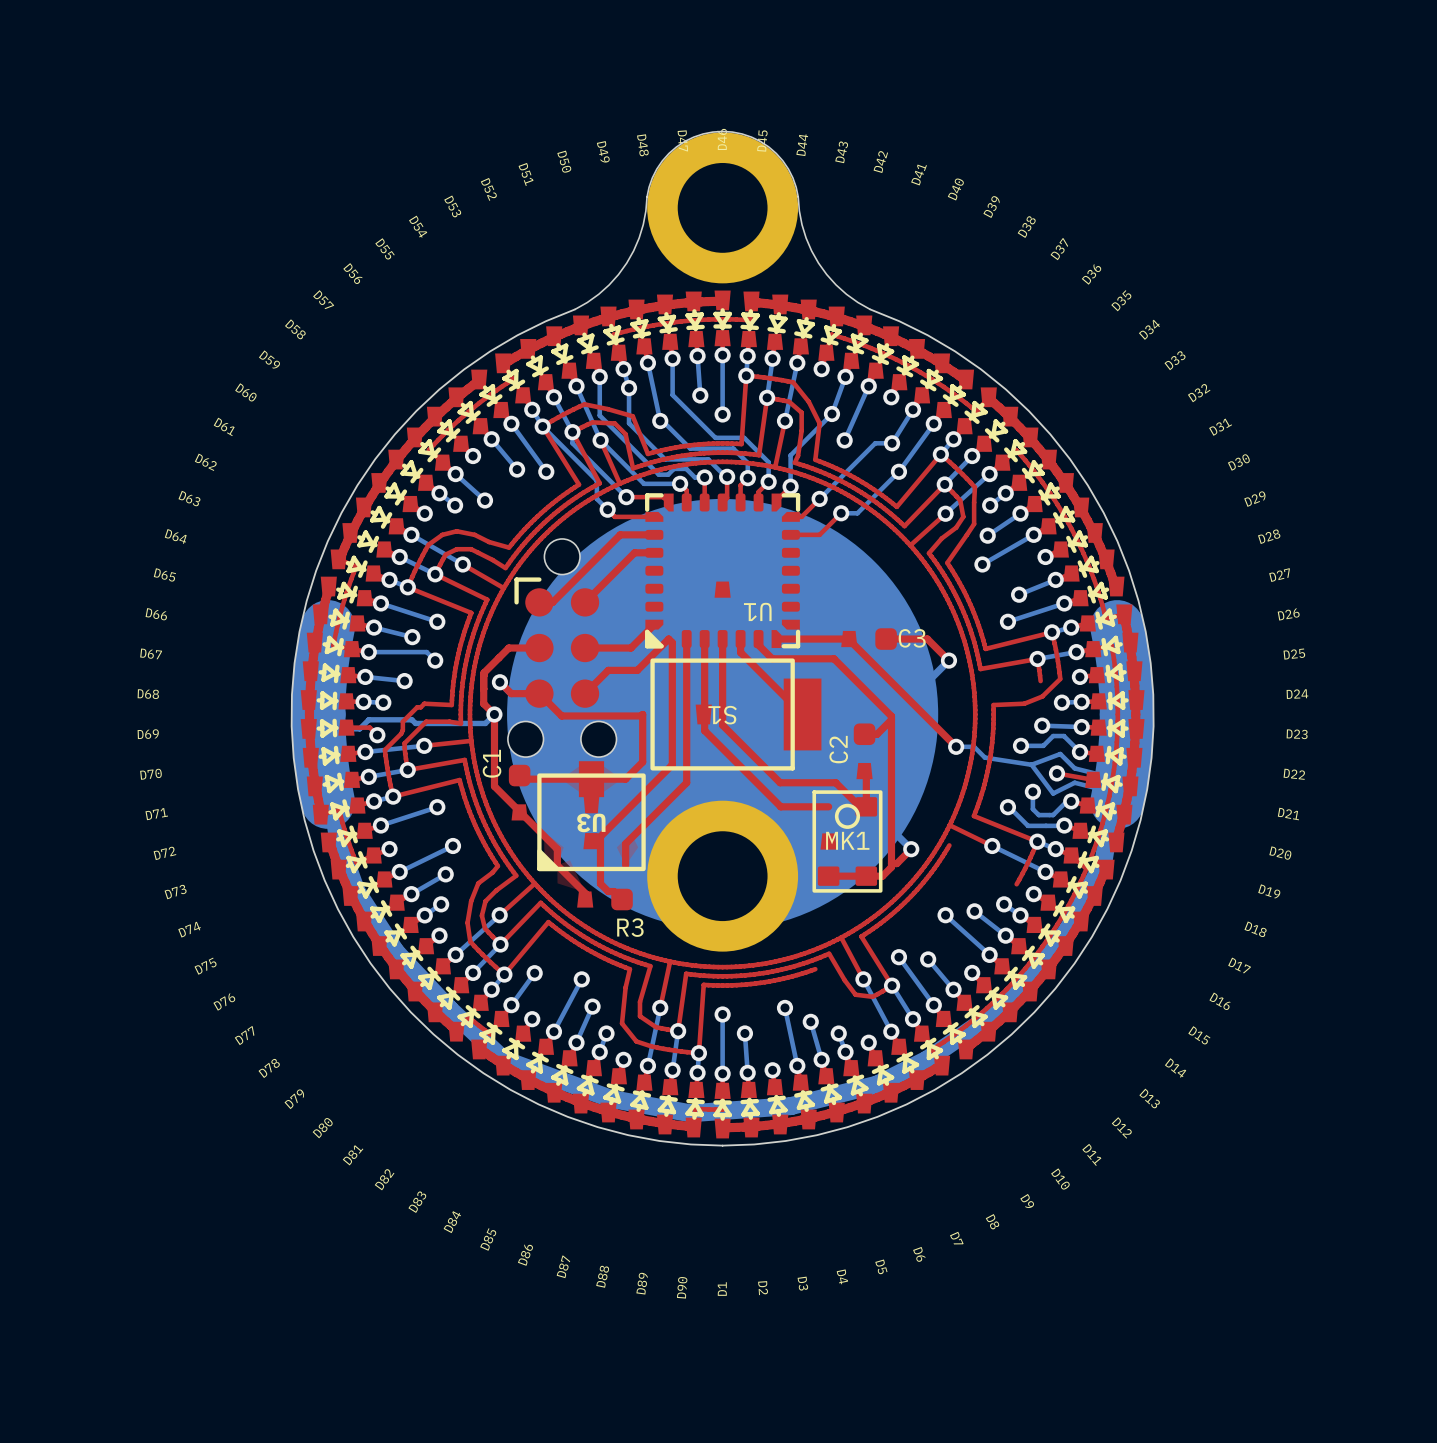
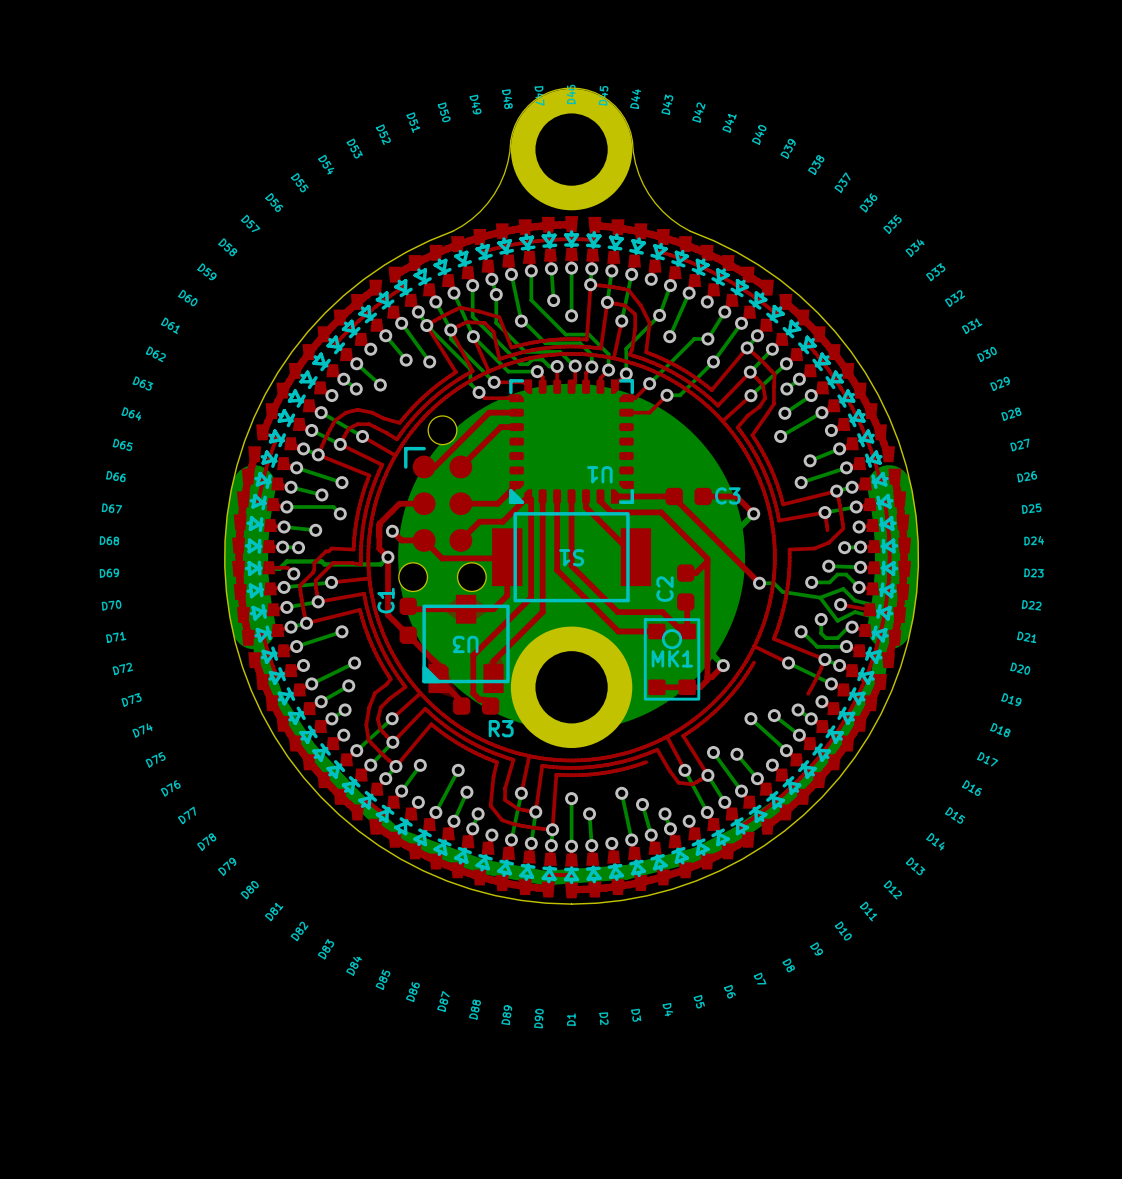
U1 footprint: [645, 493, 801, 649] -> [509, 379, 635, 505]
C3 footprint: [841, 628, 897, 650] -> [665, 487, 712, 506]
S1 footprint: [650, 658, 822, 771] -> [492, 512, 652, 603]
C2 footprint: [853, 723, 876, 780] -> [677, 564, 695, 611]
U3 footprint: [537, 761, 646, 872] -> [422, 594, 510, 694]
C1 footprint: [508, 764, 531, 821] -> [399, 597, 417, 644]
MK1 footprint: [812, 790, 883, 893] -> [643, 618, 701, 701]
R3 footprint: [577, 888, 633, 911] -> [453, 697, 500, 715]

